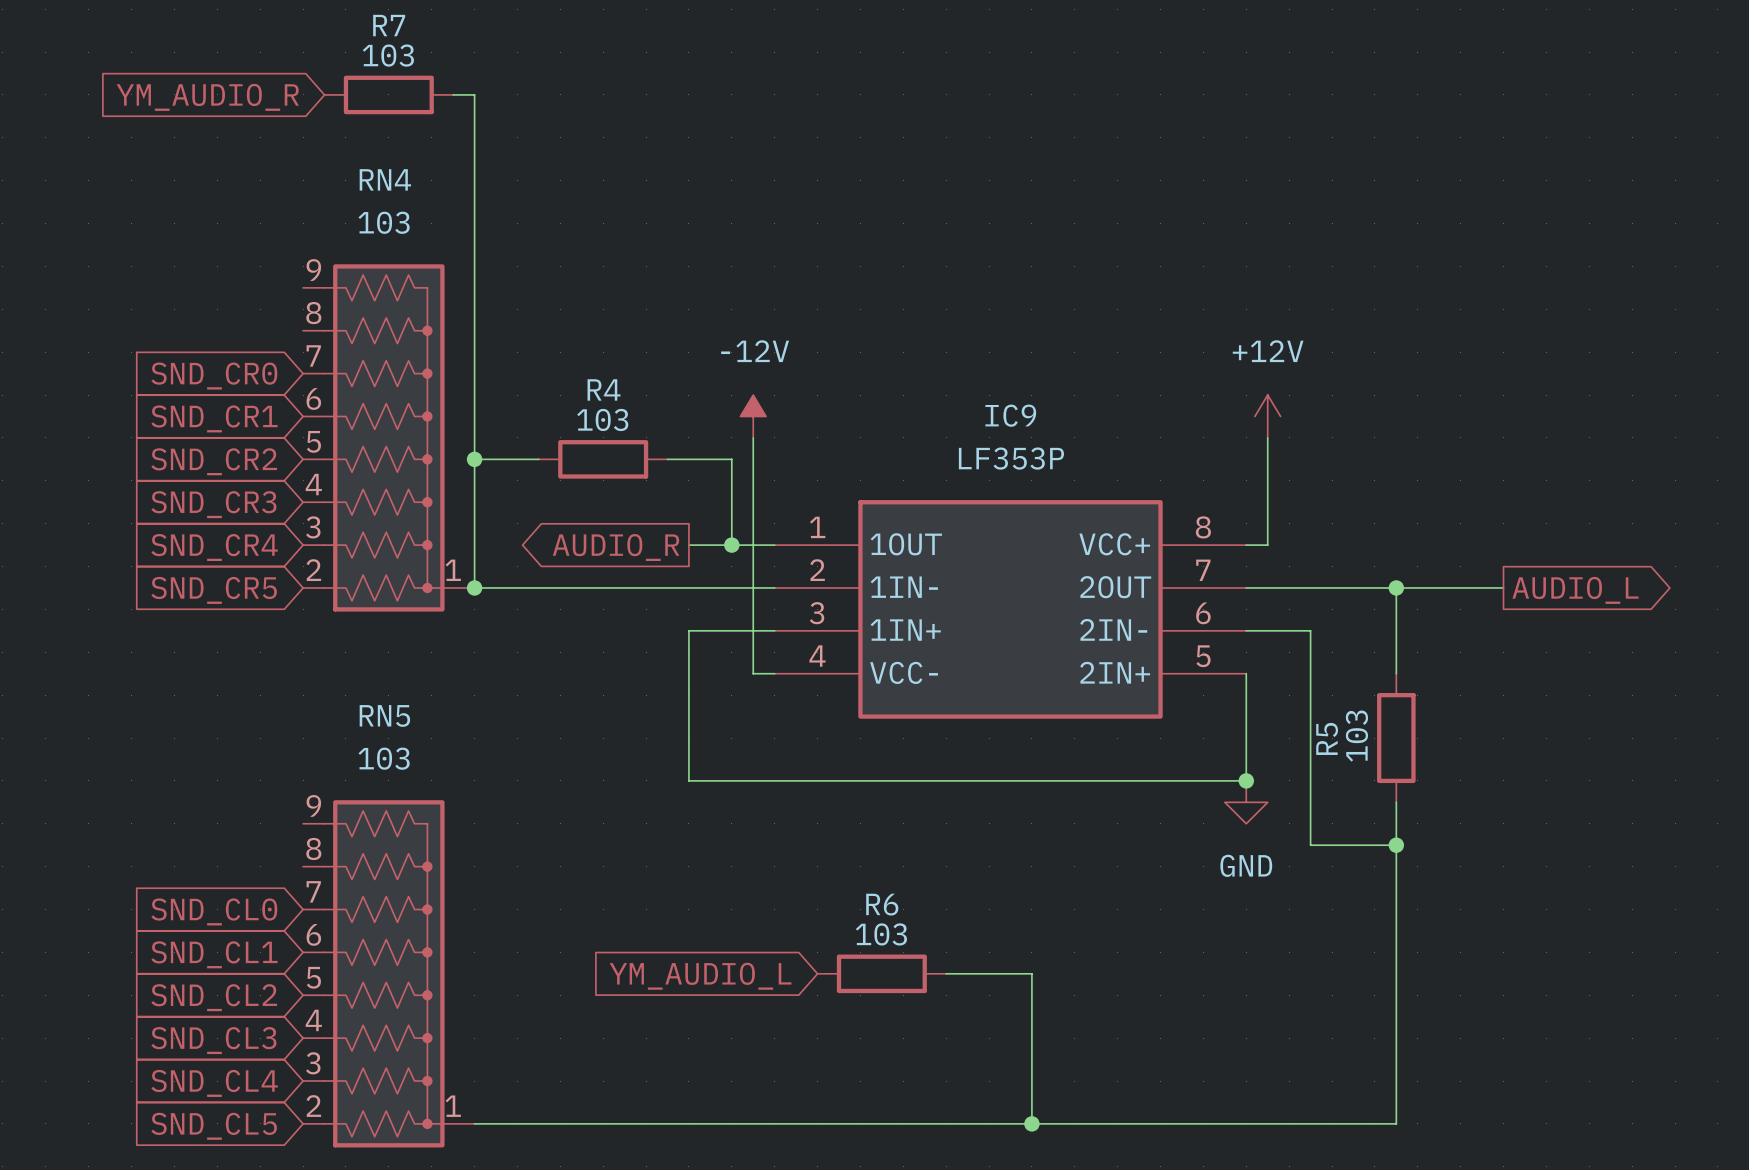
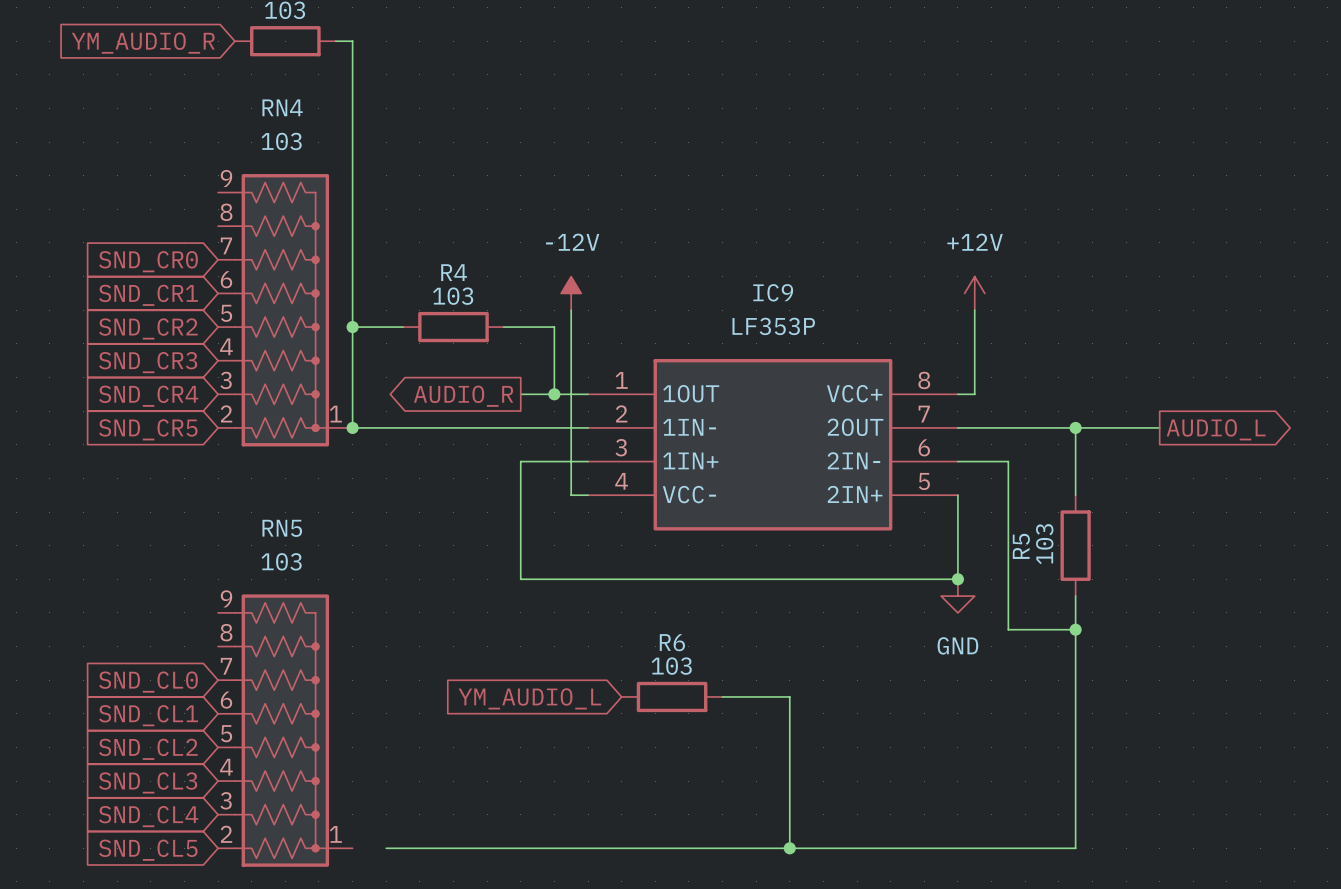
R6 position: (881, 973) -> (672, 696)
wire: (946, 973) (1031, 973) -> (722, 696) (789, 696) (789, 730)
global label position: YM_AUDIO_L (700, 976) -> YM_AUDIO_L (529, 698)
wire: (474, 1123) (517, 1123) -> none

